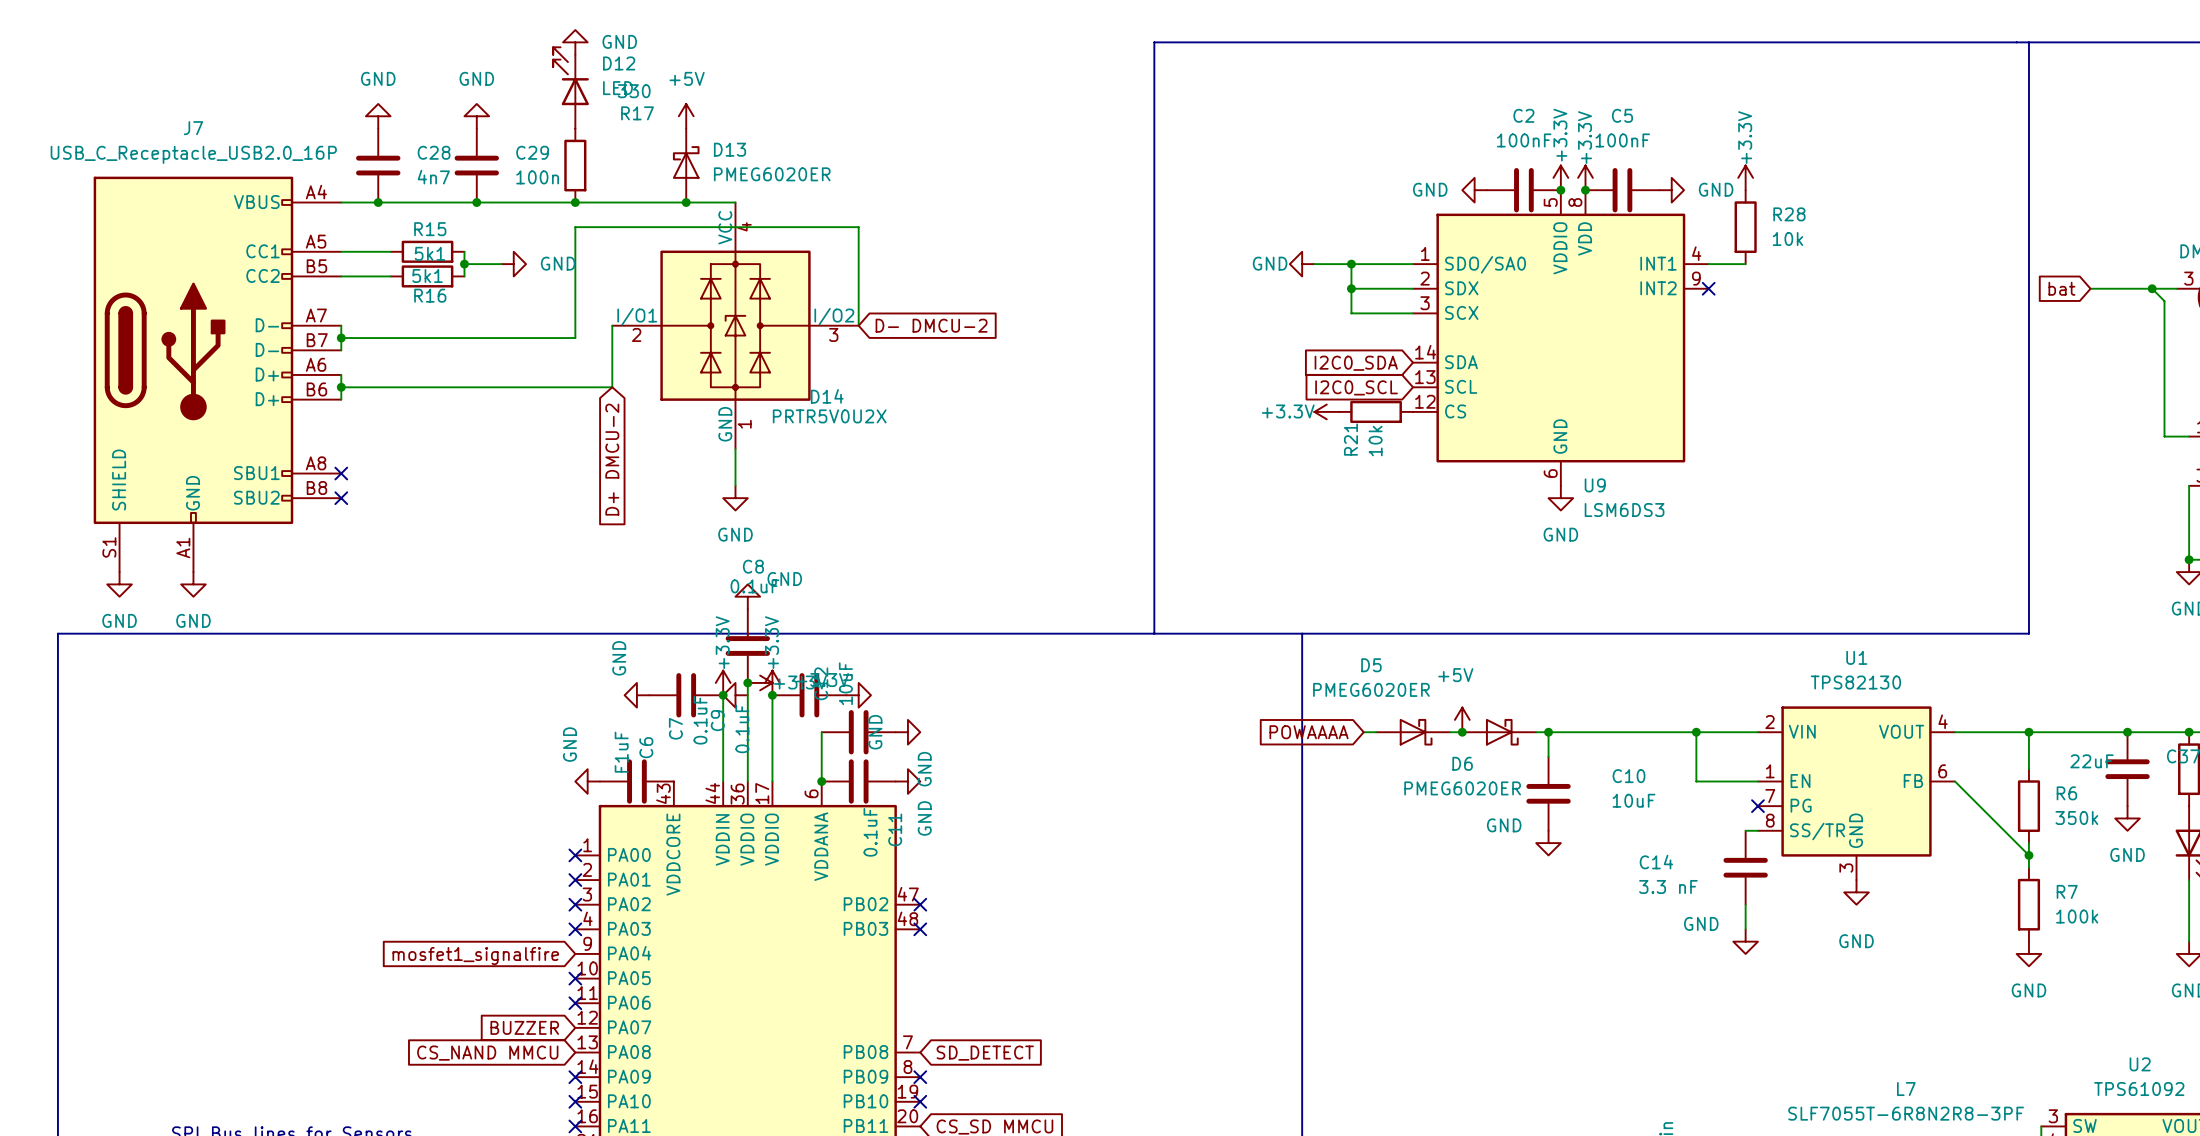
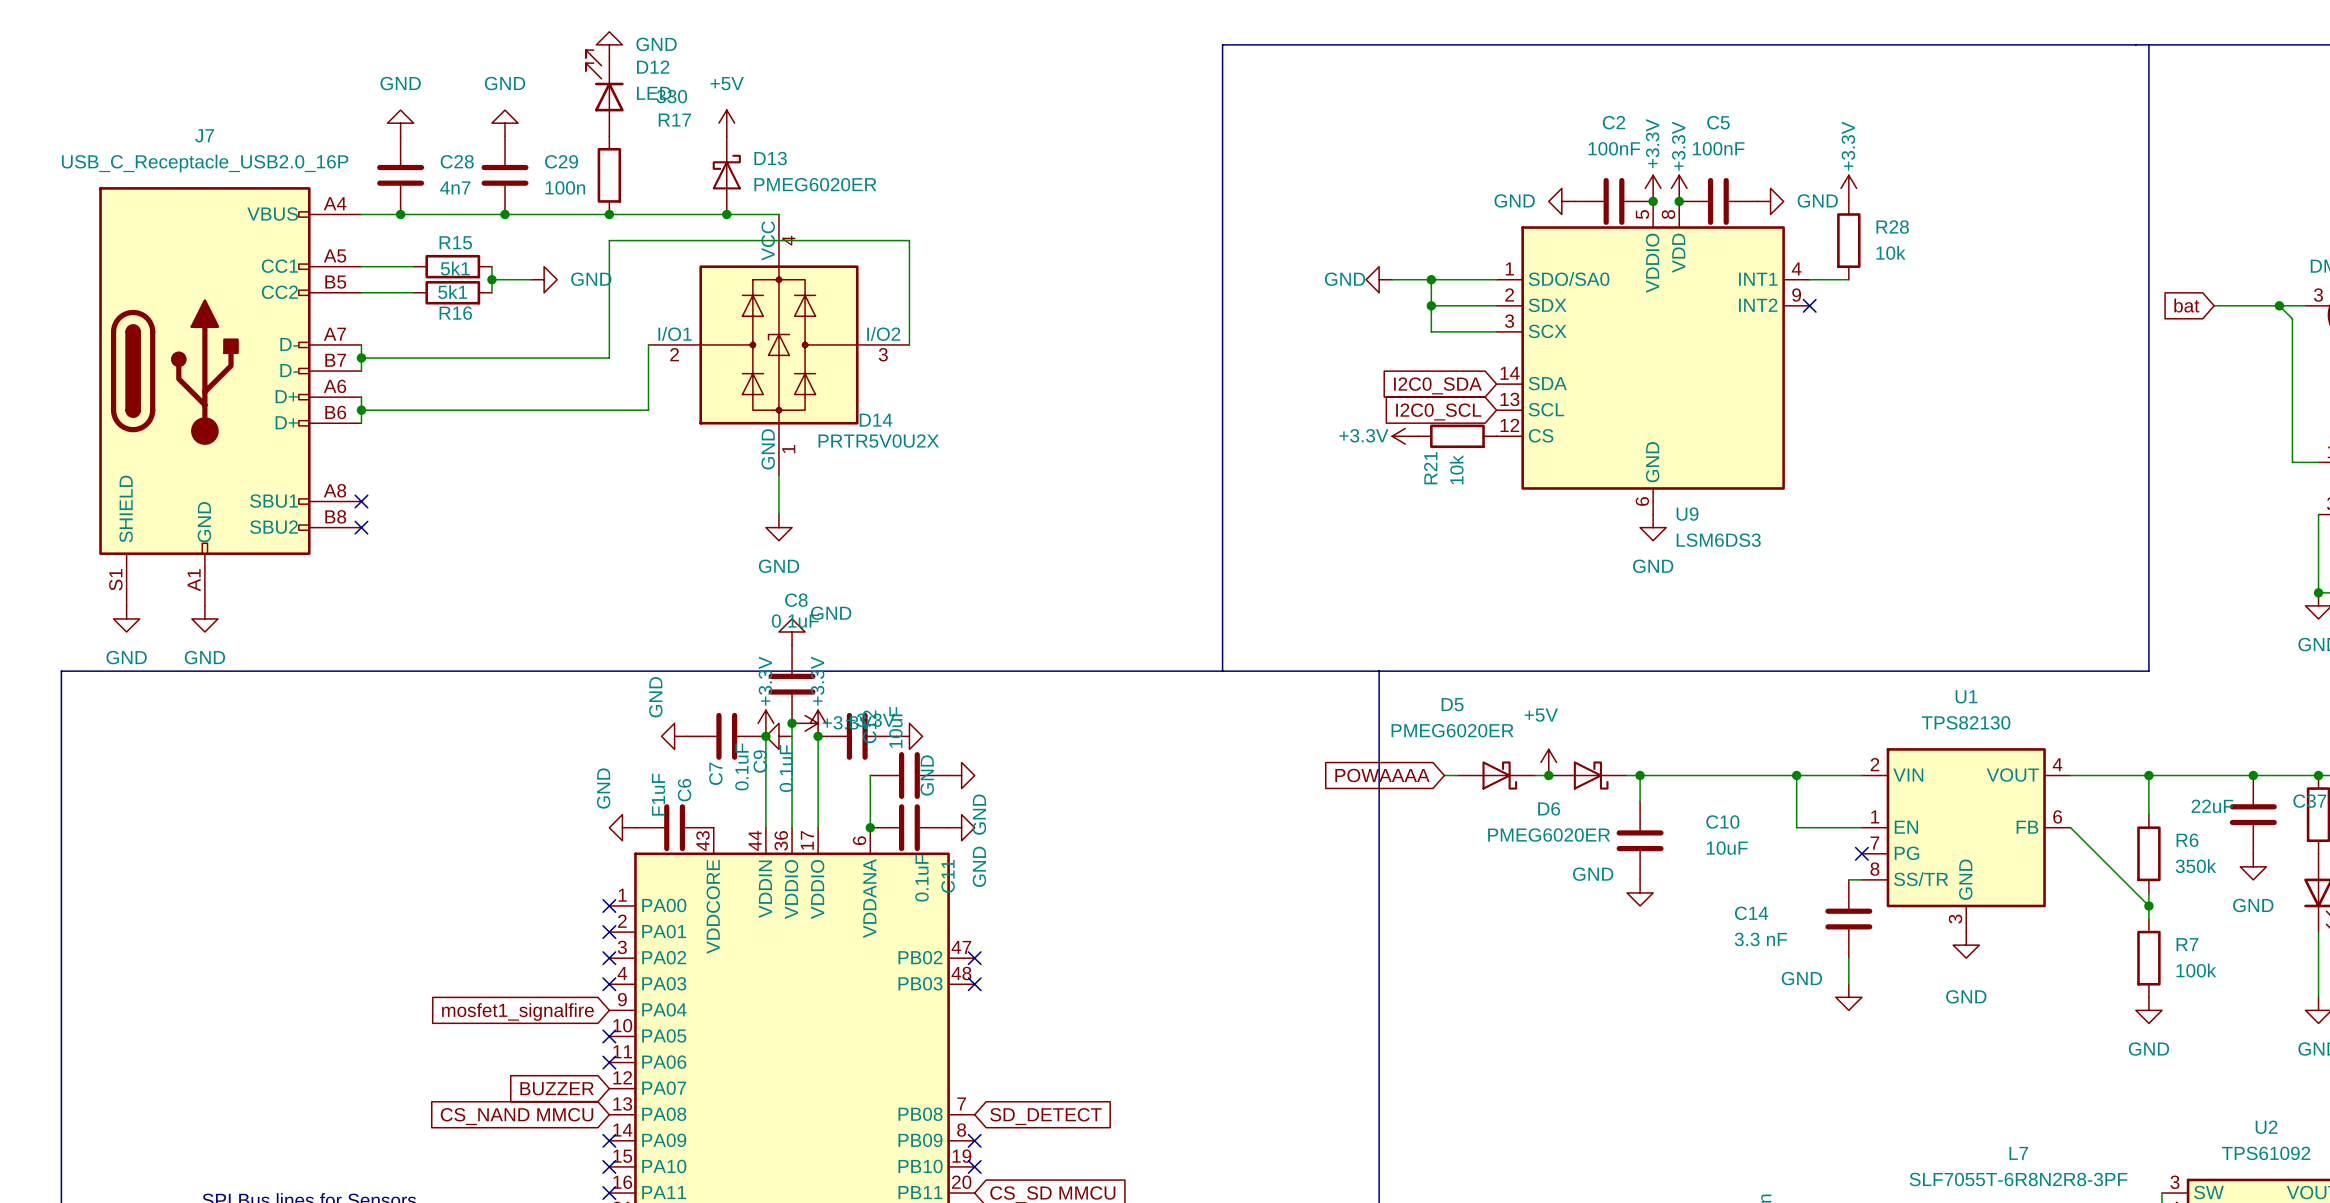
global label: D- DMCU-2 (931, 325) -> none
global label: D+ DMCU-2 (612, 459) -> none

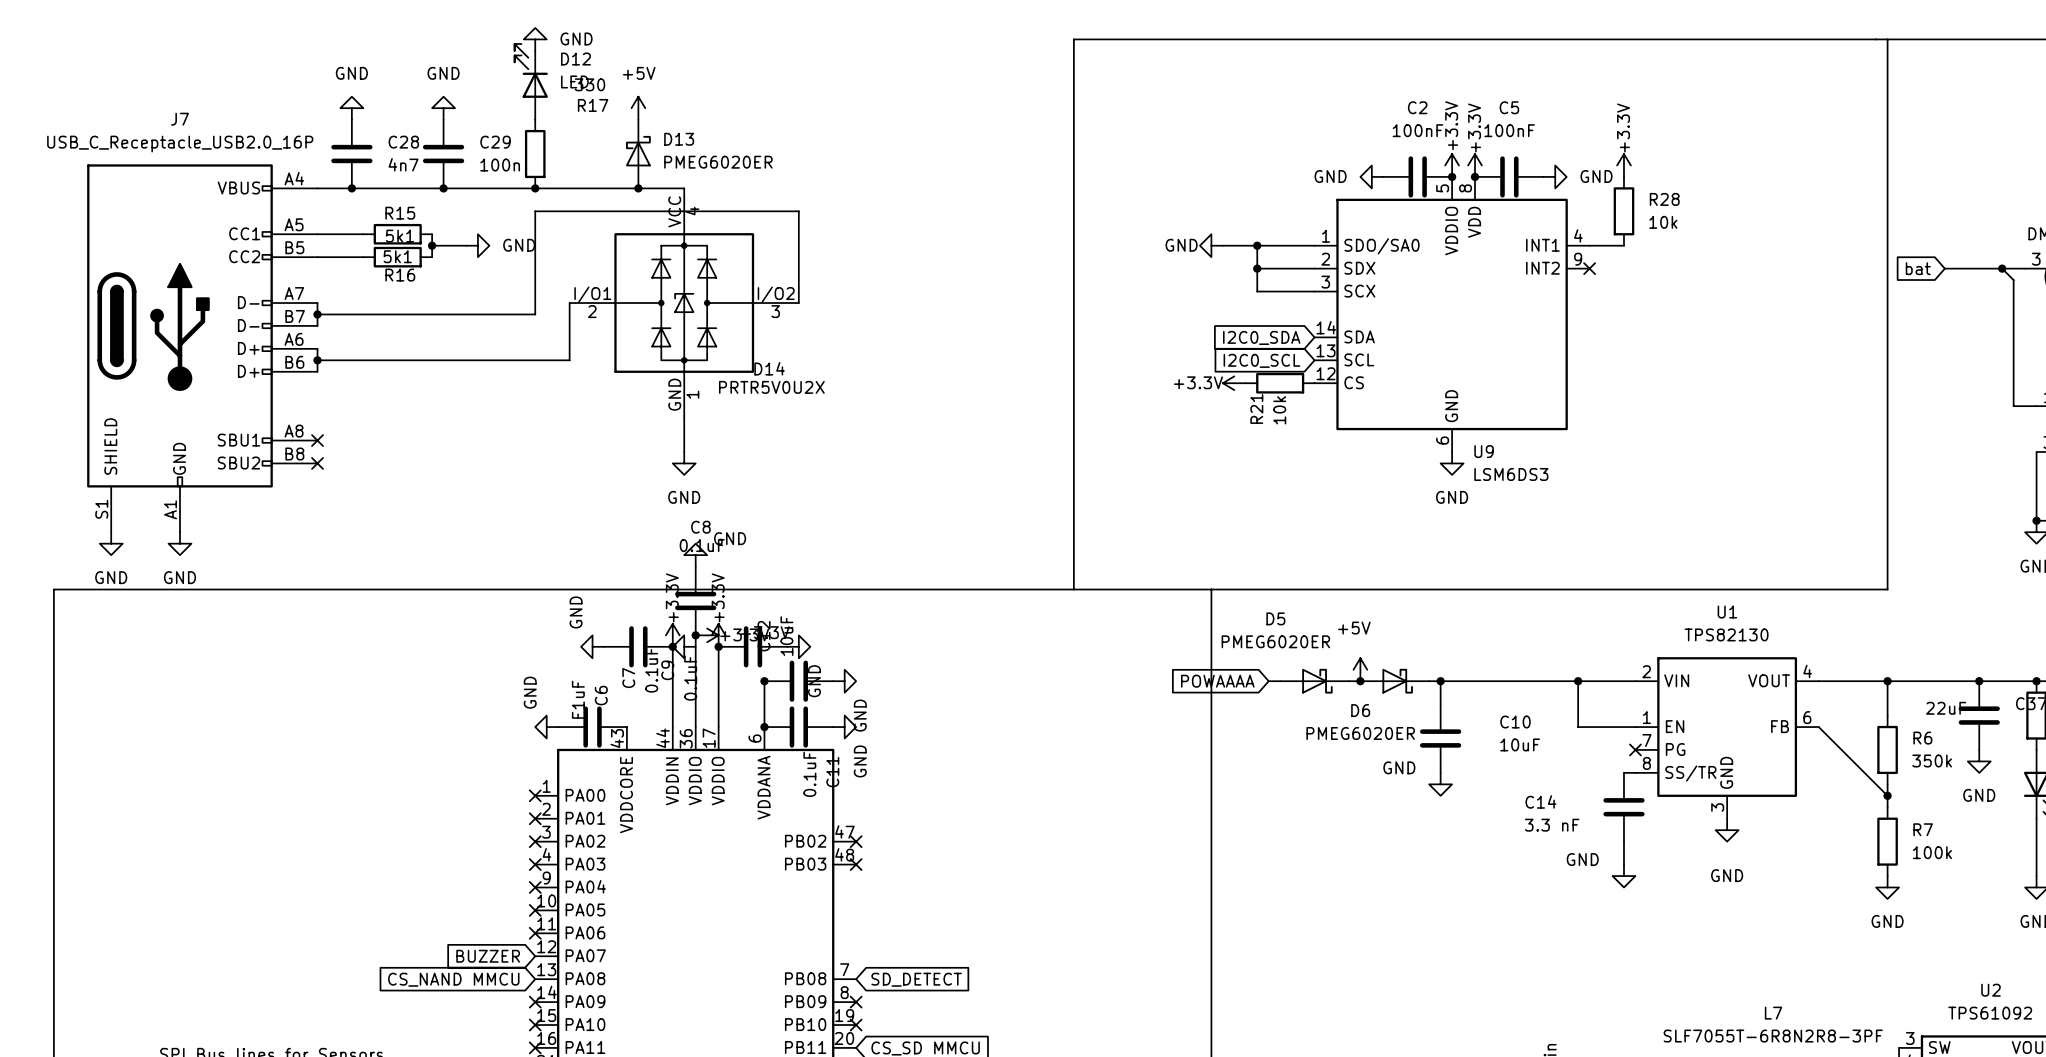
junction: none -> (764, 681)
no-connect mark: none -> (535, 887)
global label: mosfet1_signalfire (517, 1011) -> none

